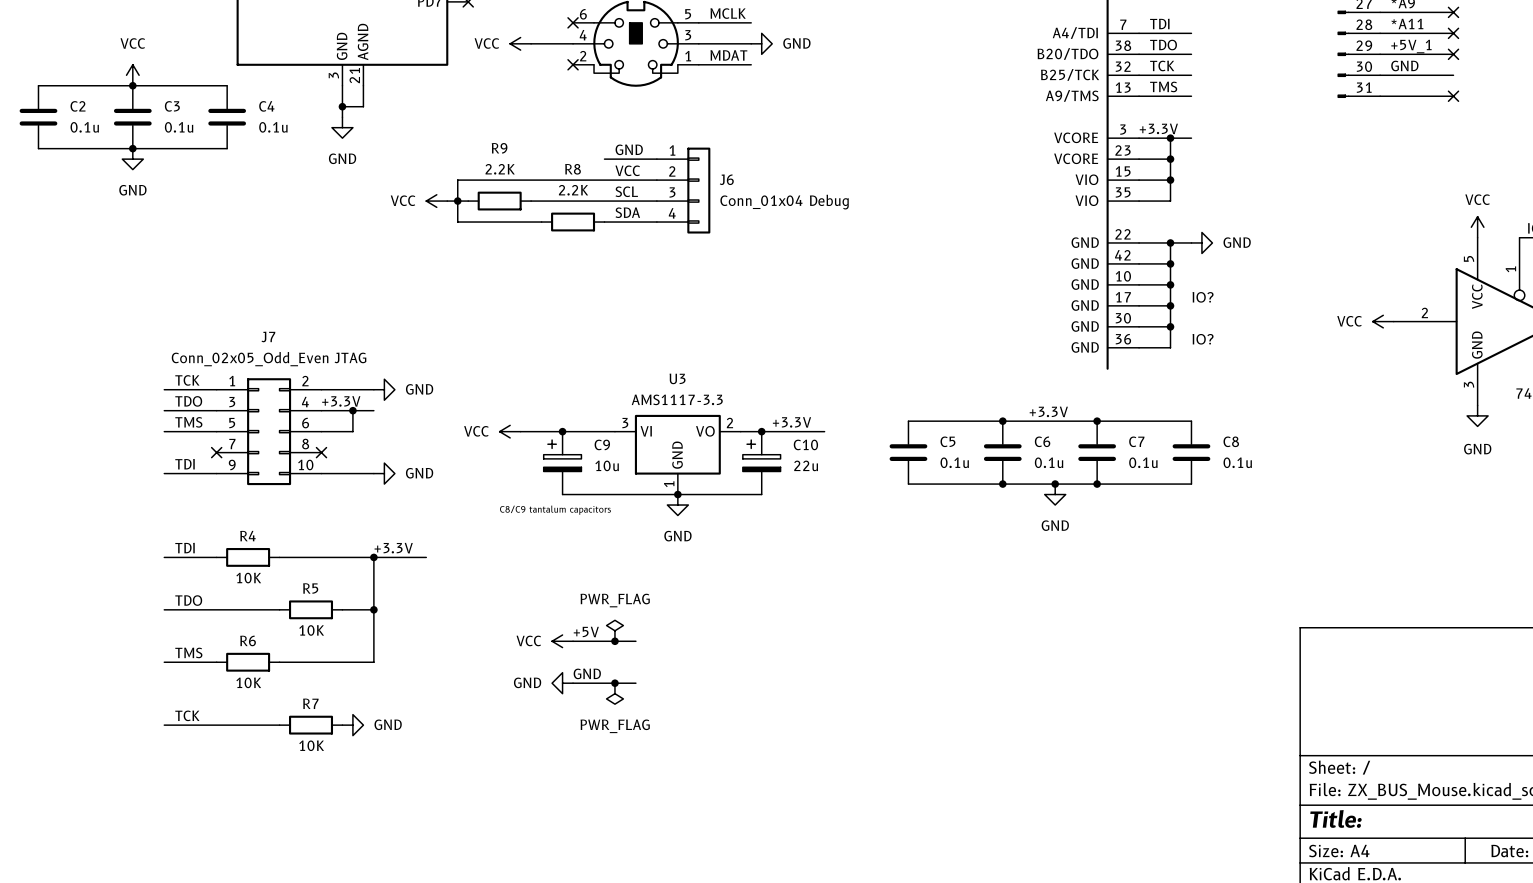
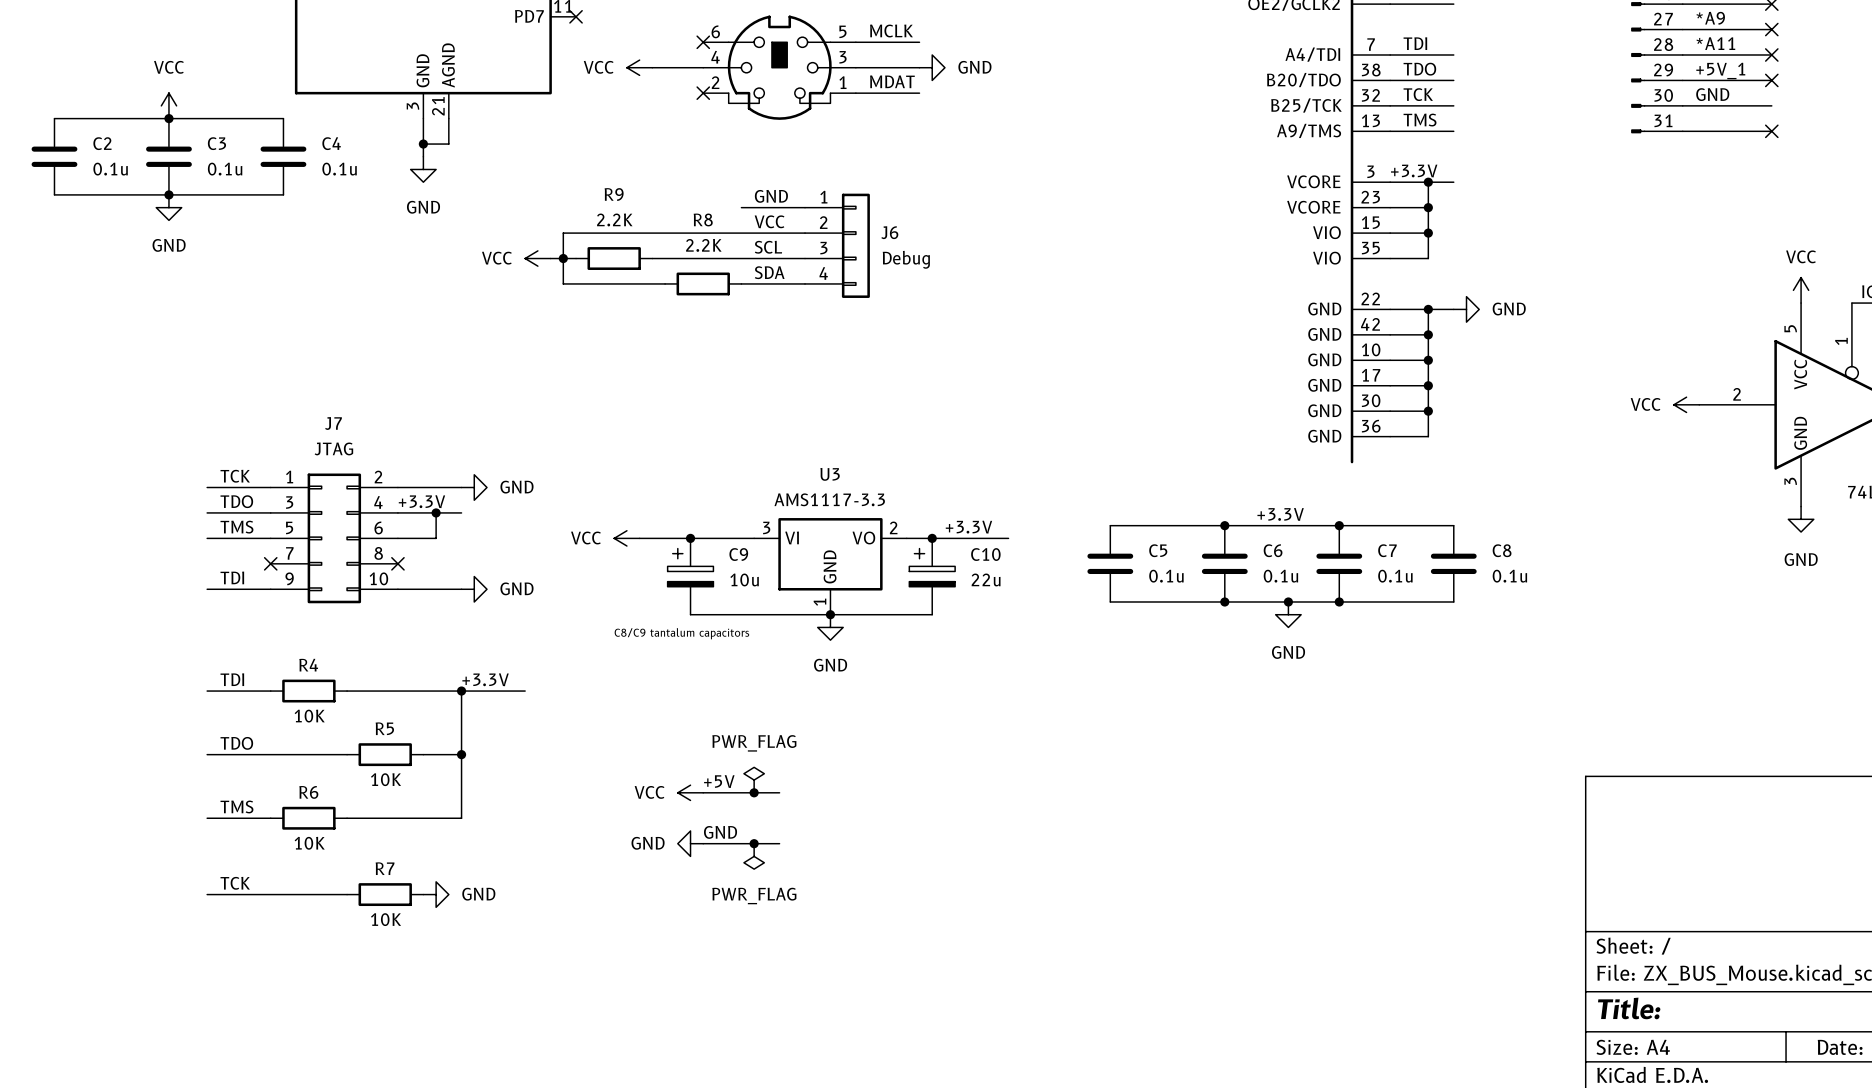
J6 value: Conn_01x04 Debug (784, 202) -> Debug (906, 259)
text: IO? (1203, 297) -> none
text: IO? (1203, 339) -> none
J7 value: Conn_02x05_Odd_Even JTAG (269, 359) -> JTAG (333, 448)

